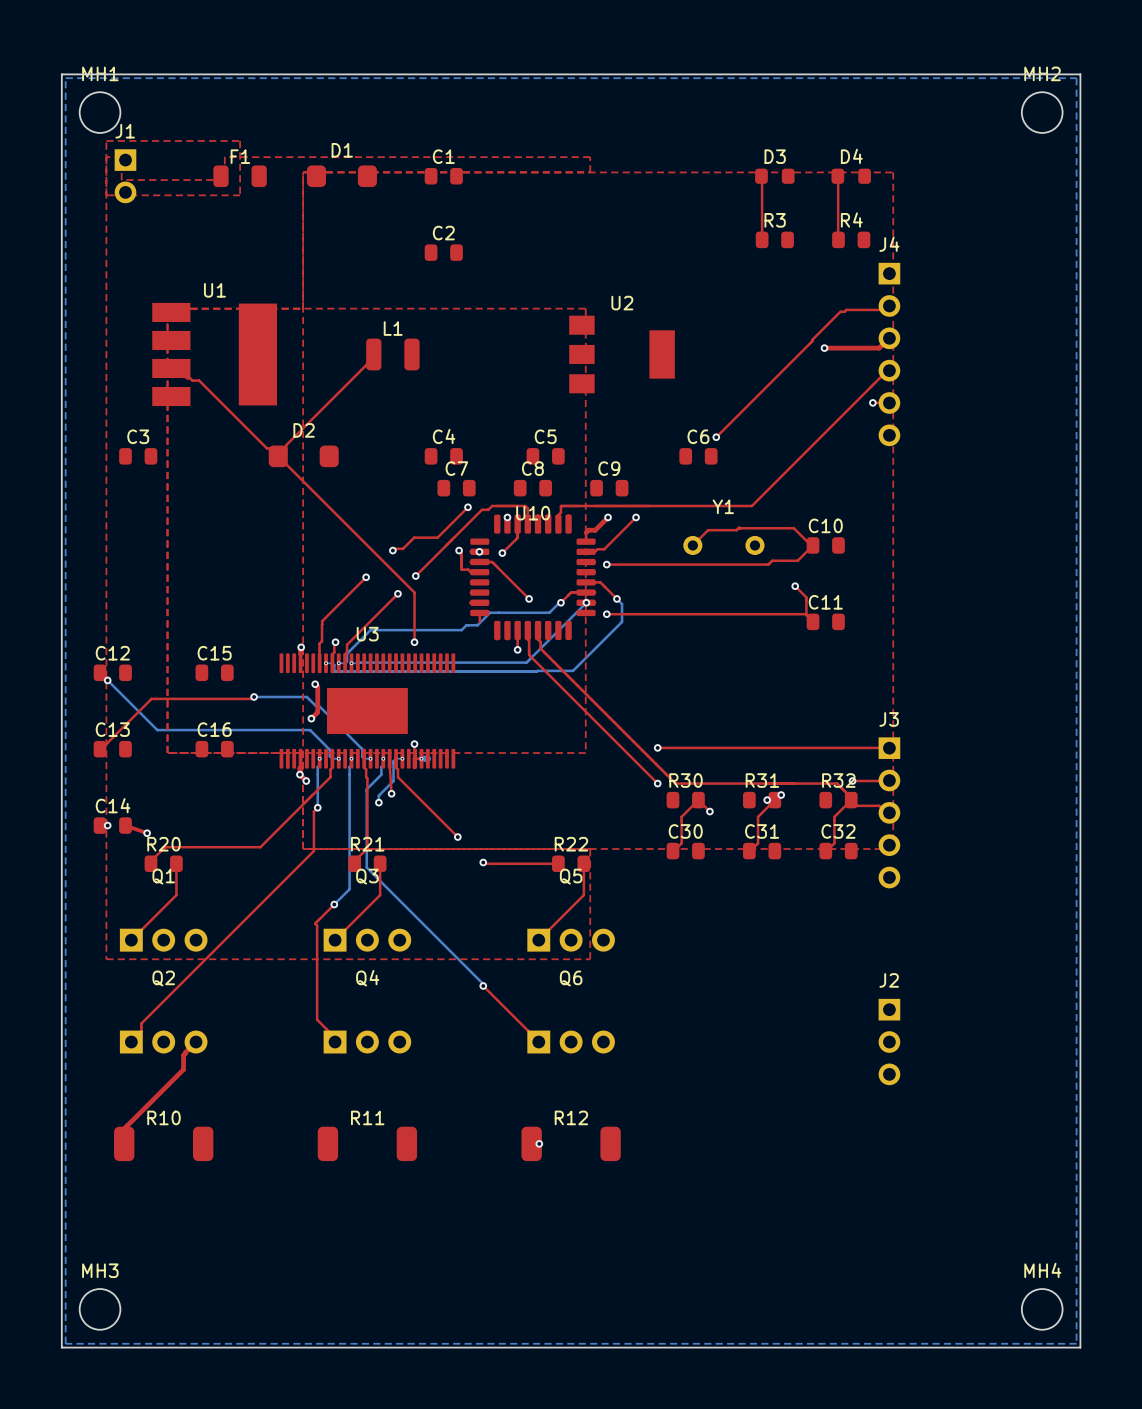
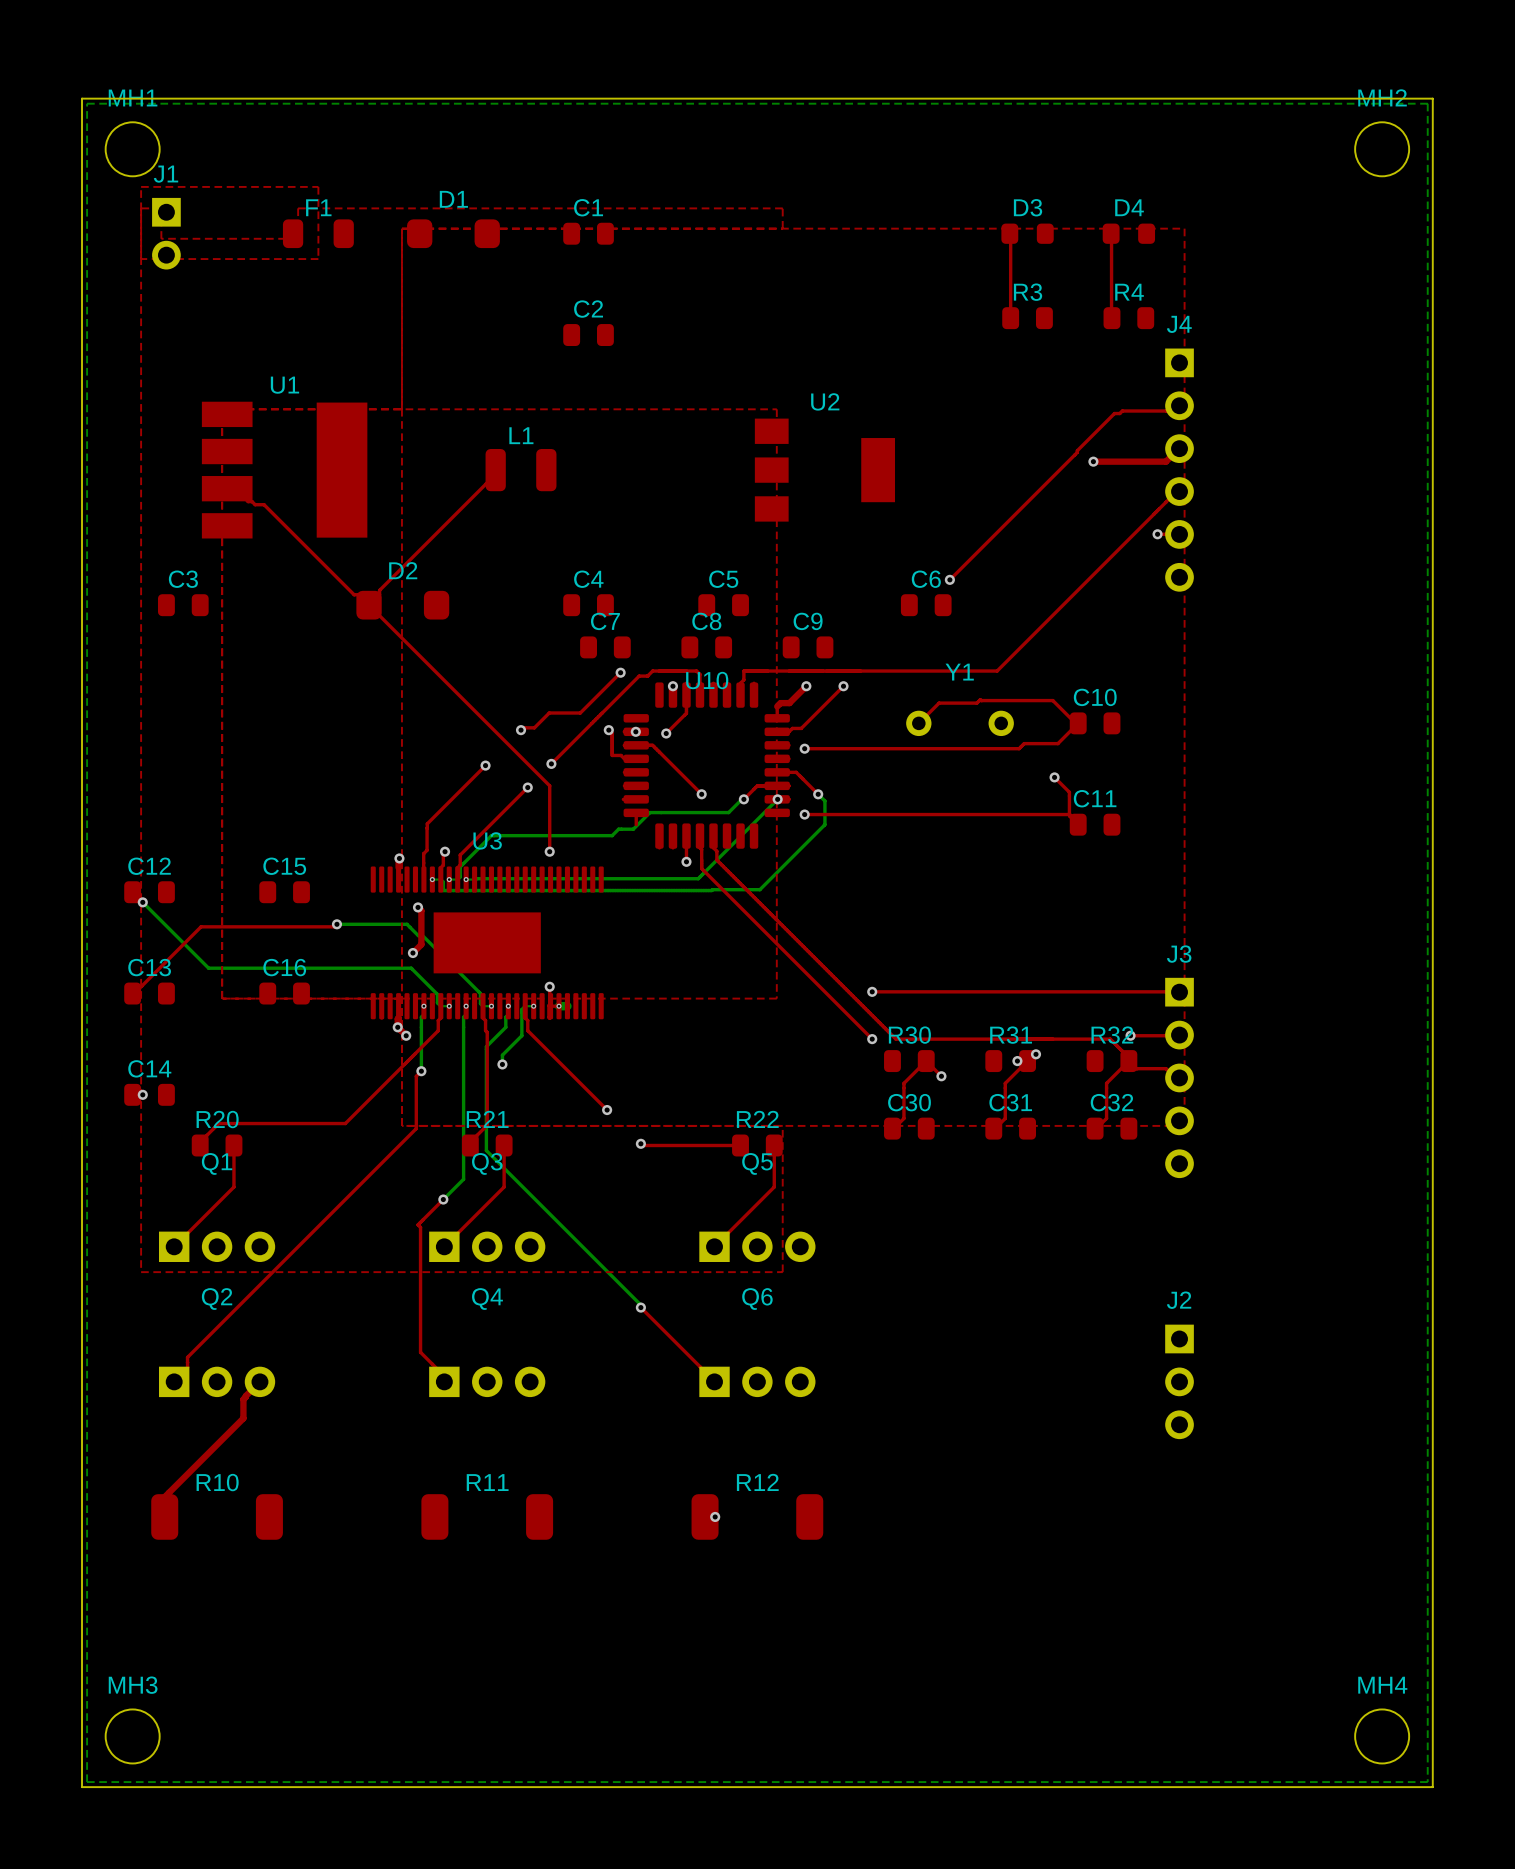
top track: (389, 758) (391, 793) -> none
via: (391, 793) -> none
top track: (125, 825) (147, 833) -> none
via: (147, 833) -> none

